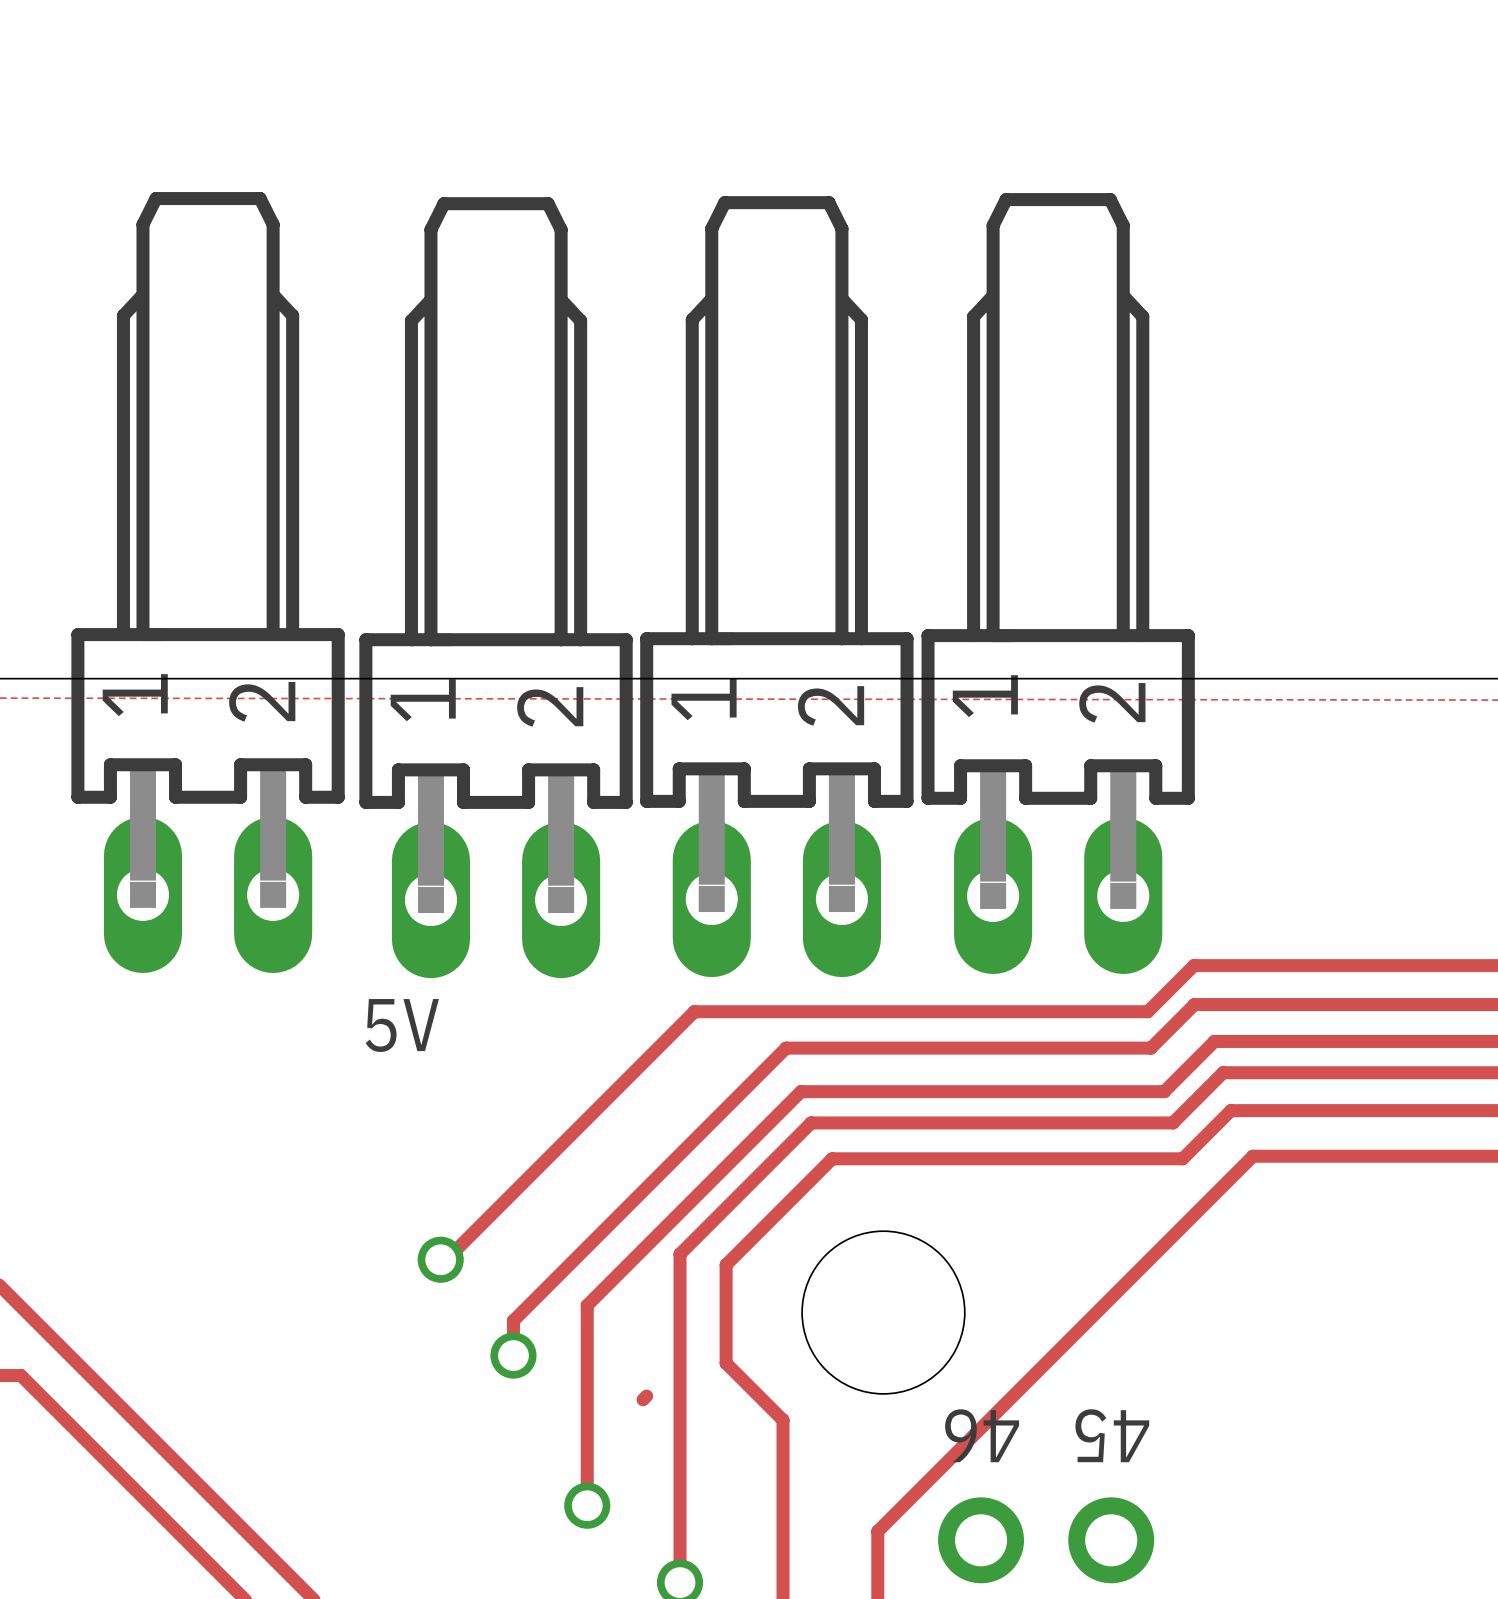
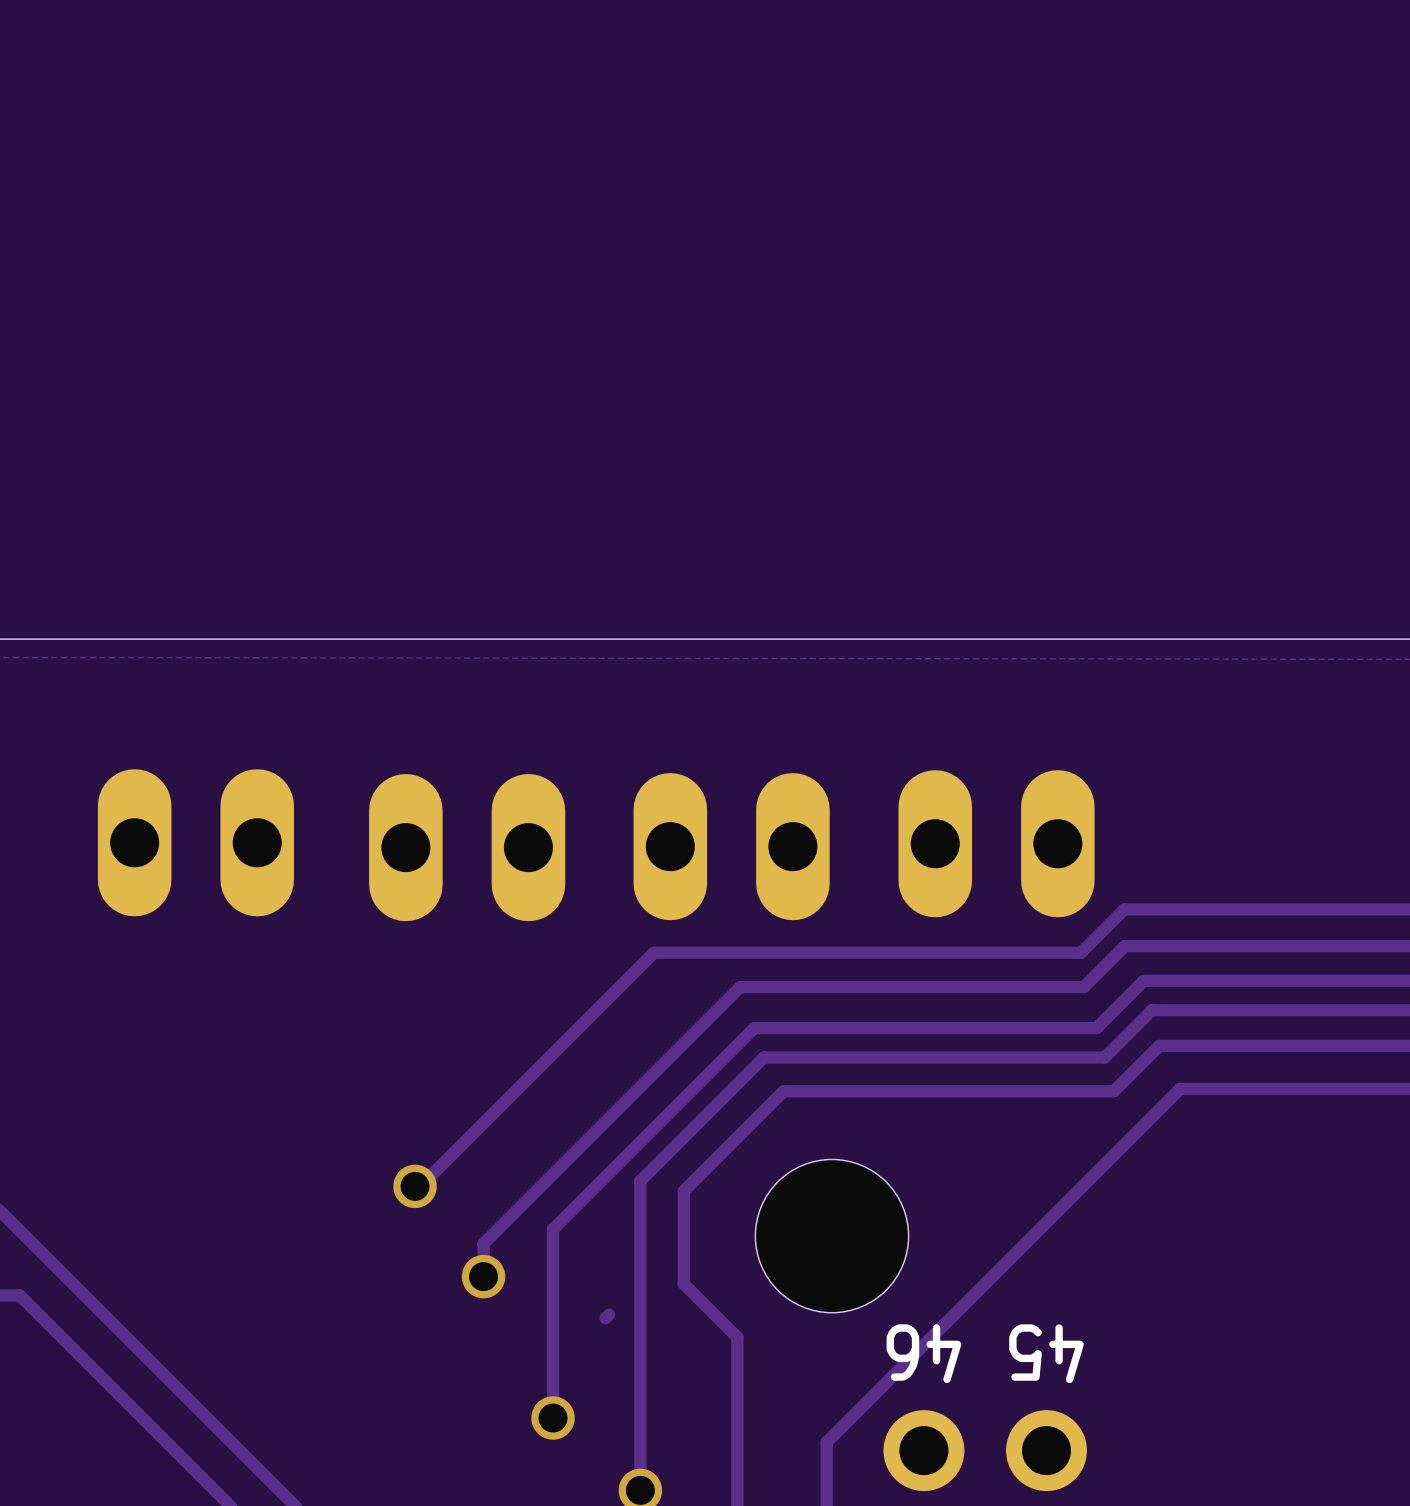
part side: top (208, 582) -> bottom (195, 842)
part side: top (1058, 583) -> bottom (996, 843)
part side: top (776, 586) -> bottom (731, 846)
5V side: top (496, 587) -> bottom (467, 847)

